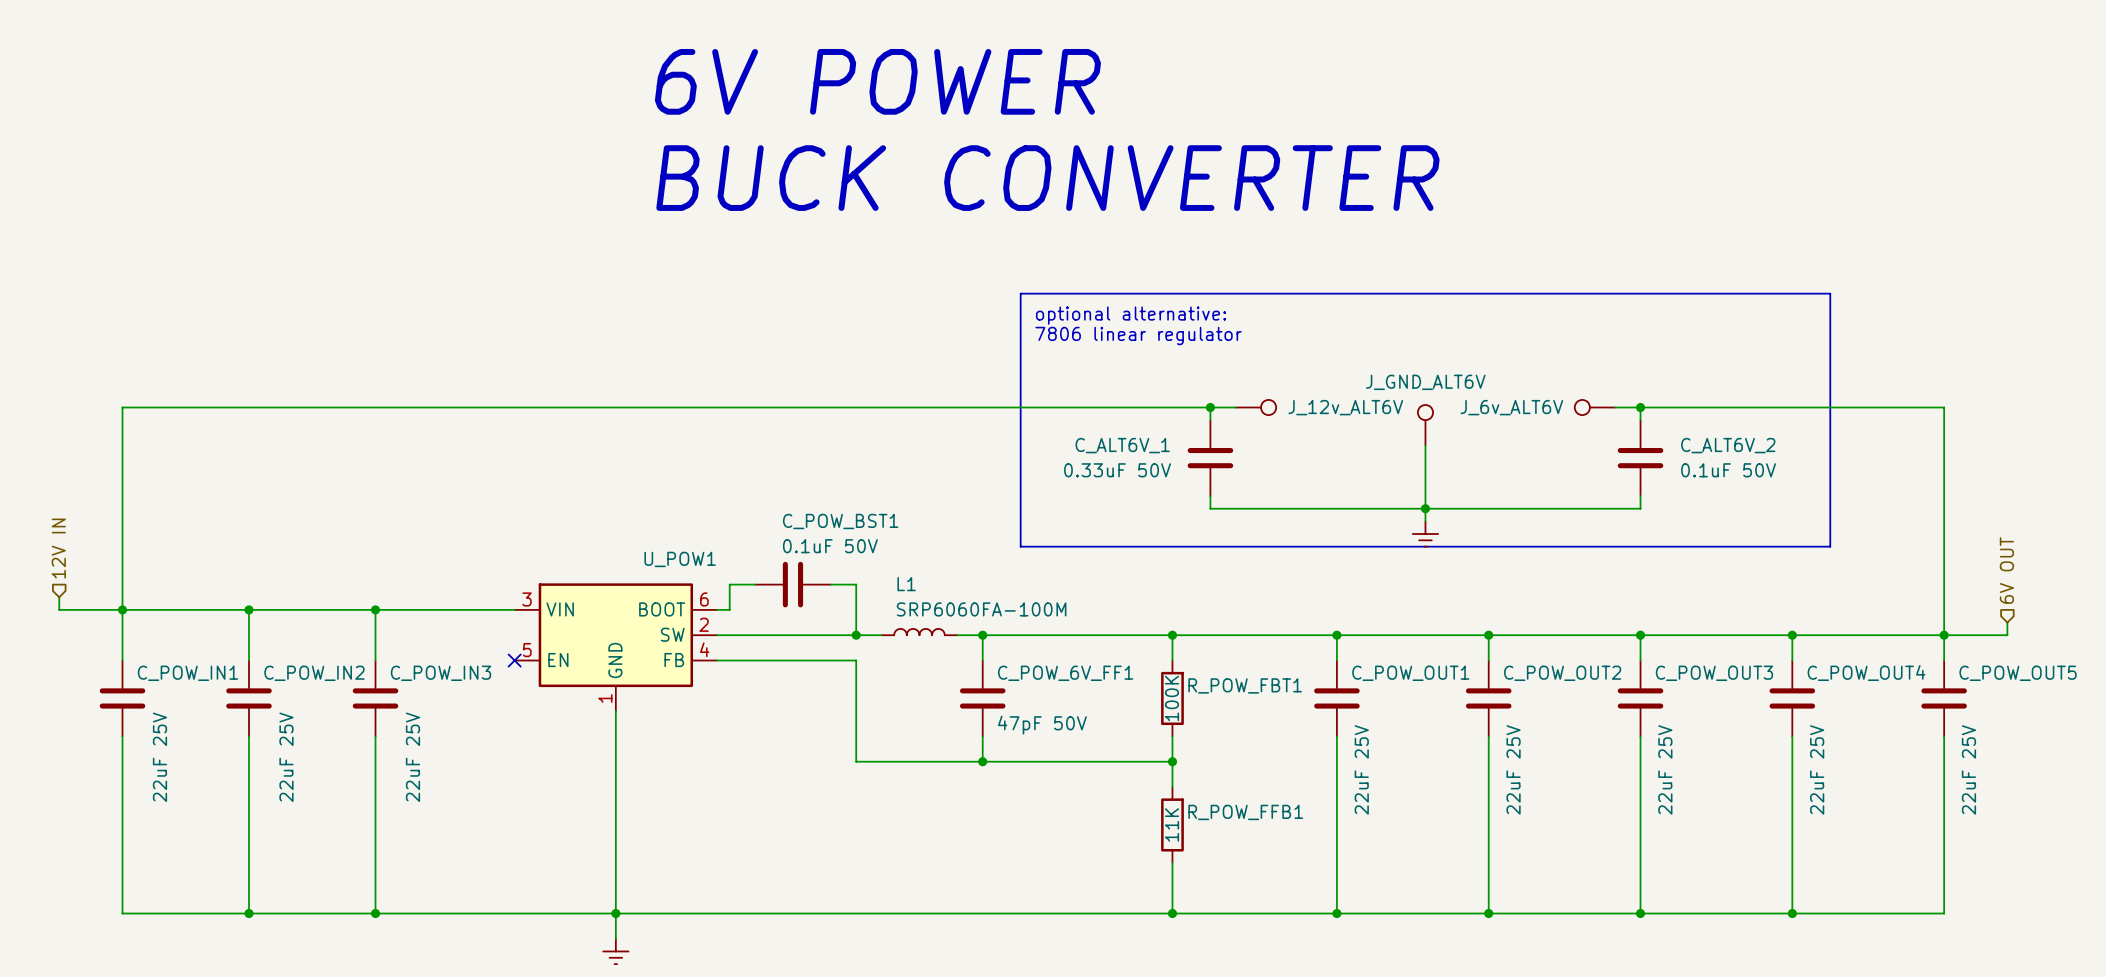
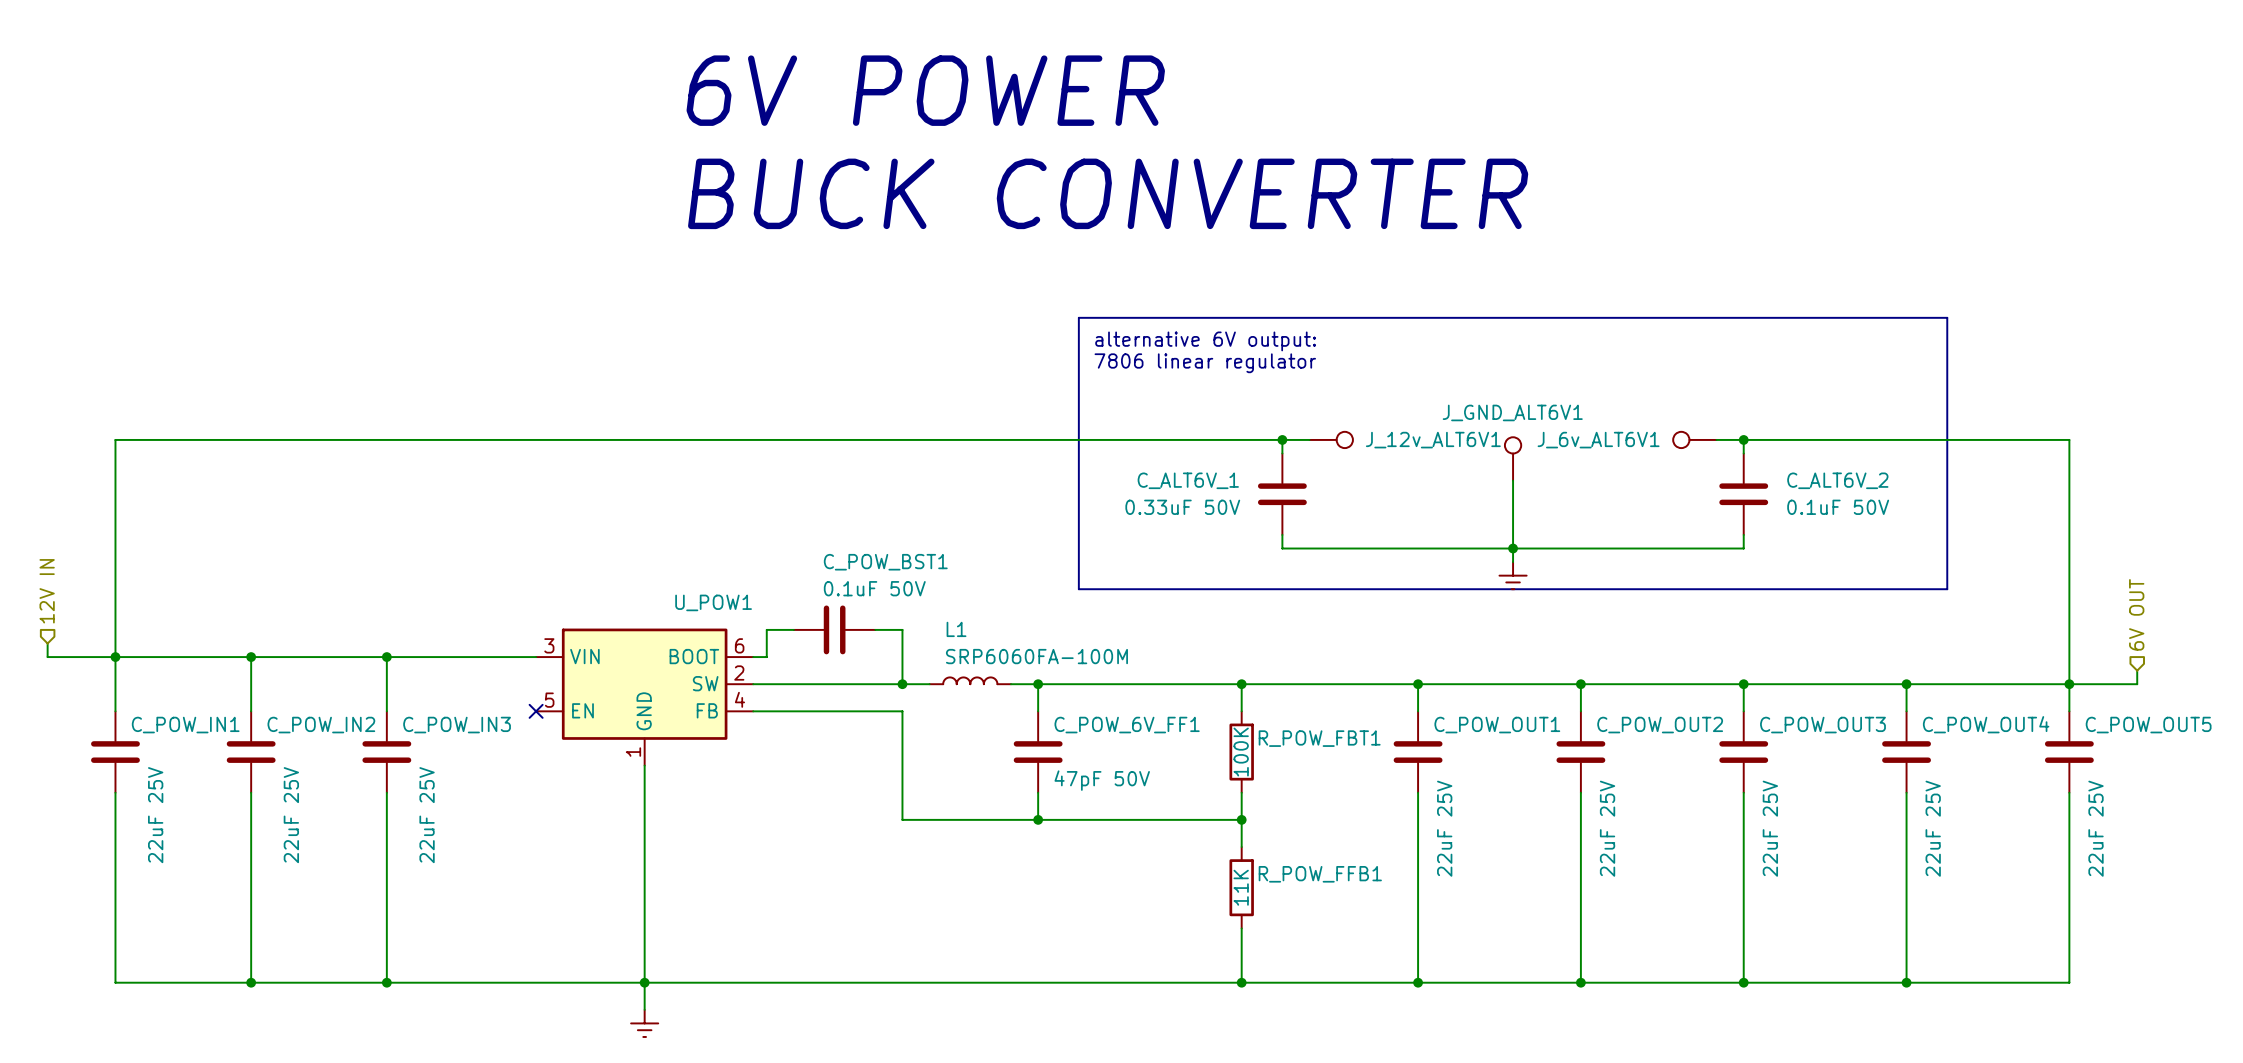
text: optional alternative: (1131, 315) -> alternative 6V output: (1205, 341)
J_GND_ALT6V name: J_GND_ALT6V (1425, 382) -> J_GND_ALT6V1 (1512, 412)
J_12v_ALT6V name: J_12v_ALT6V (1345, 407) -> J_12v_ALT6V1 (1433, 440)
J_6v_ALT6V name: J_6v_ALT6V (1511, 407) -> J_6v_ALT6V1 (1598, 440)

